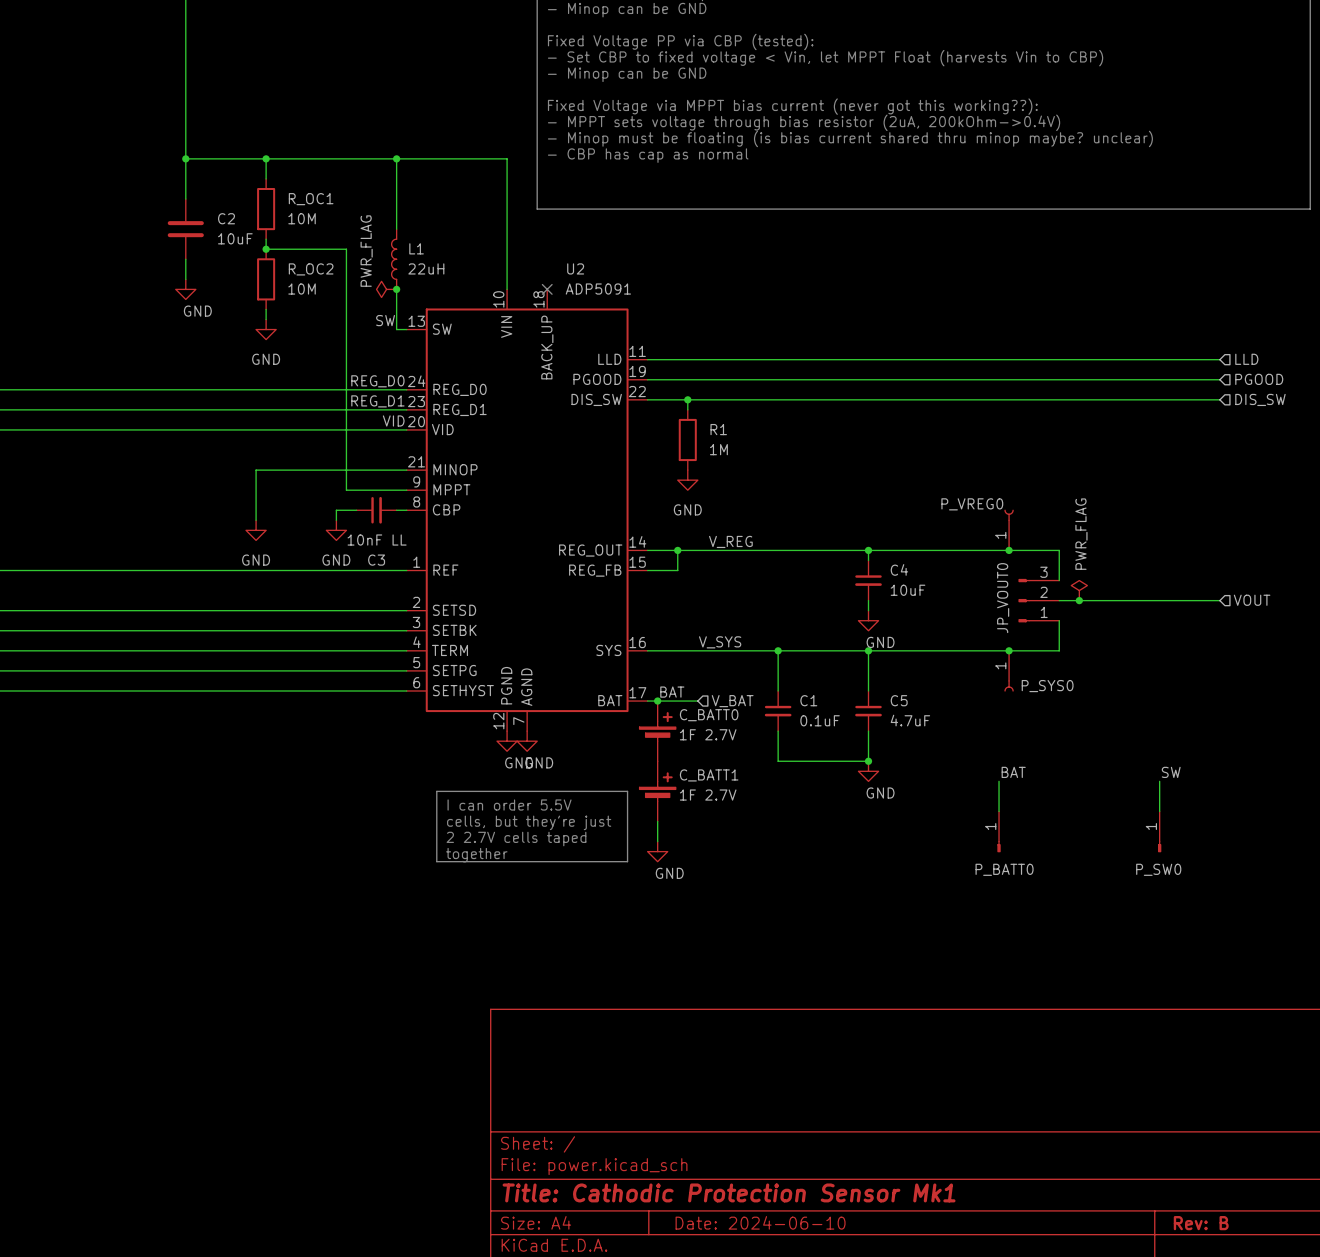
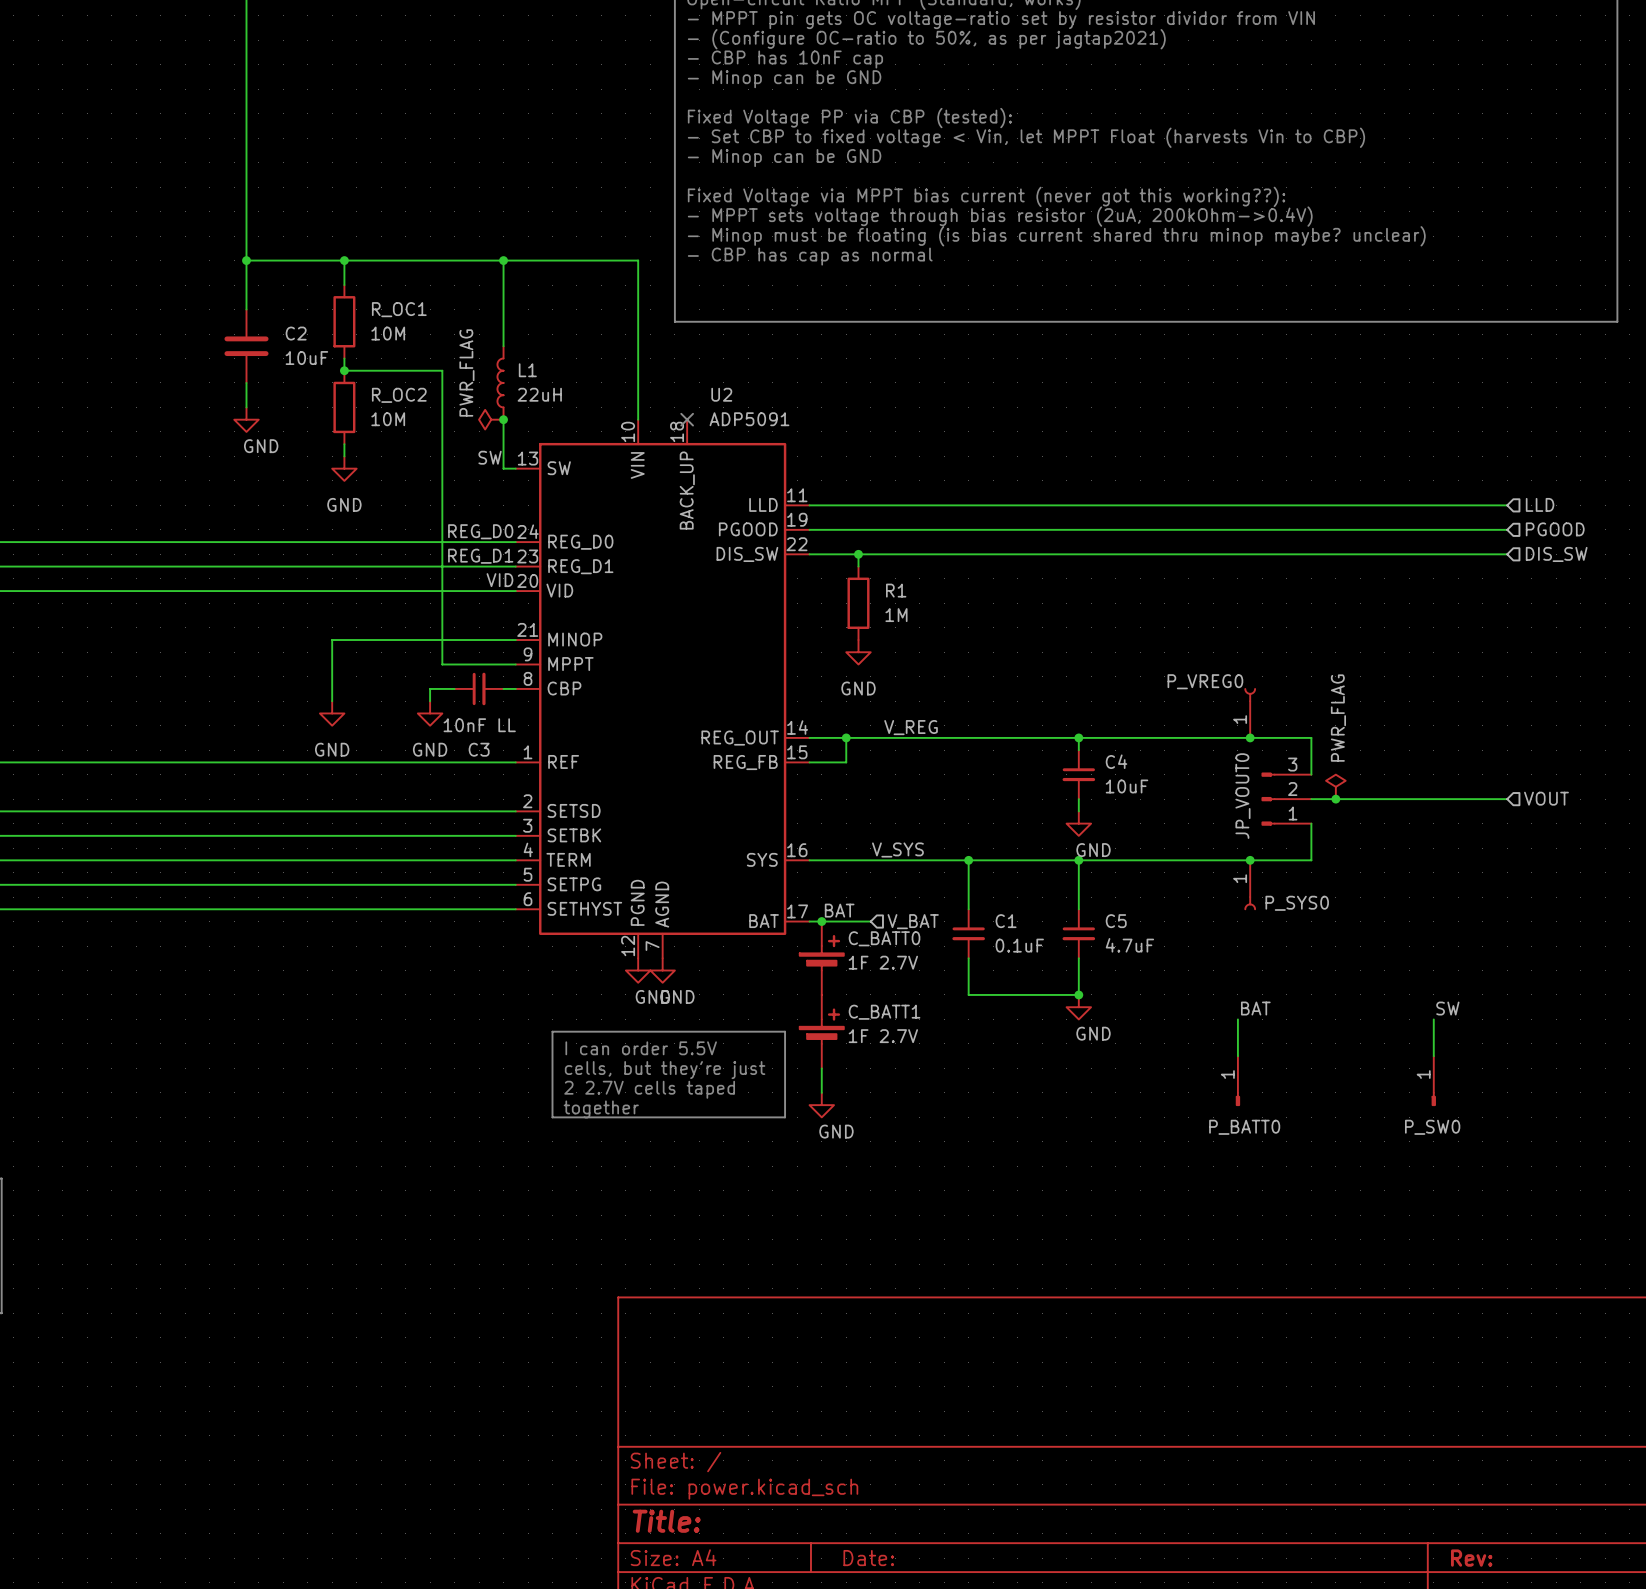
title block: Title: Cathodic Protection Sensor Mk1 (729, 1192) -> Title: (666, 1521)
title block: Date: 2024-06-10 (760, 1222) -> Date: (868, 1558)
title block: Rev: B (1201, 1223) -> Rev: (1471, 1558)

